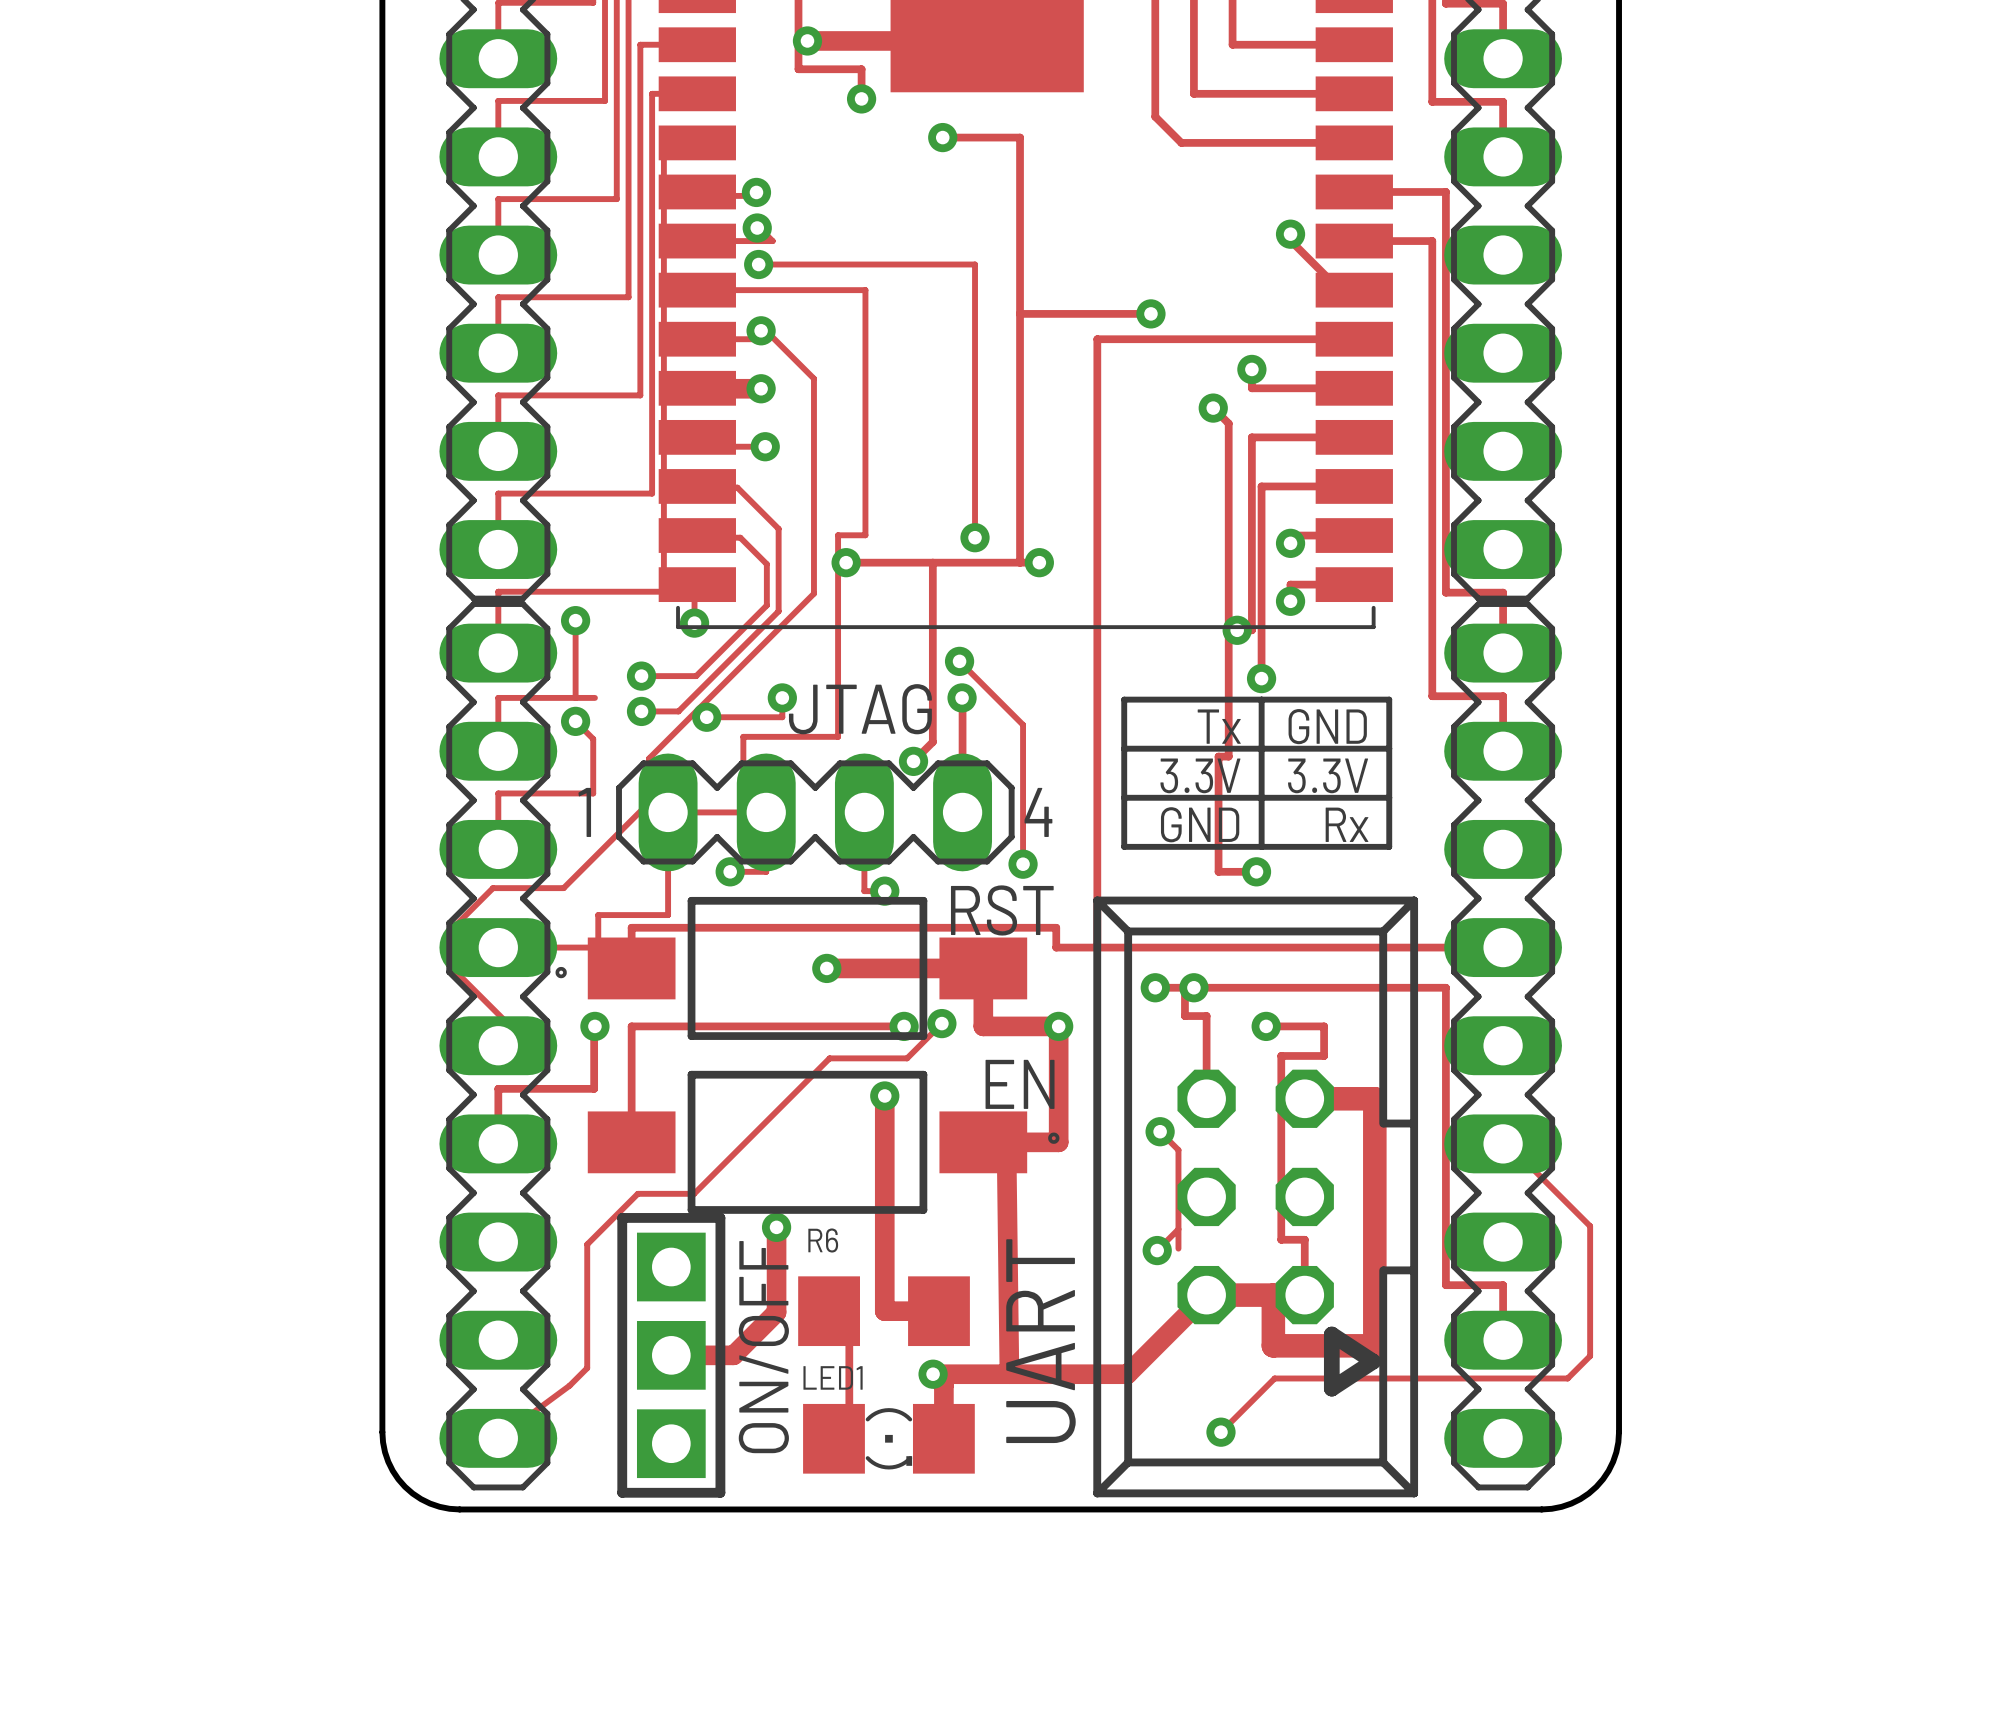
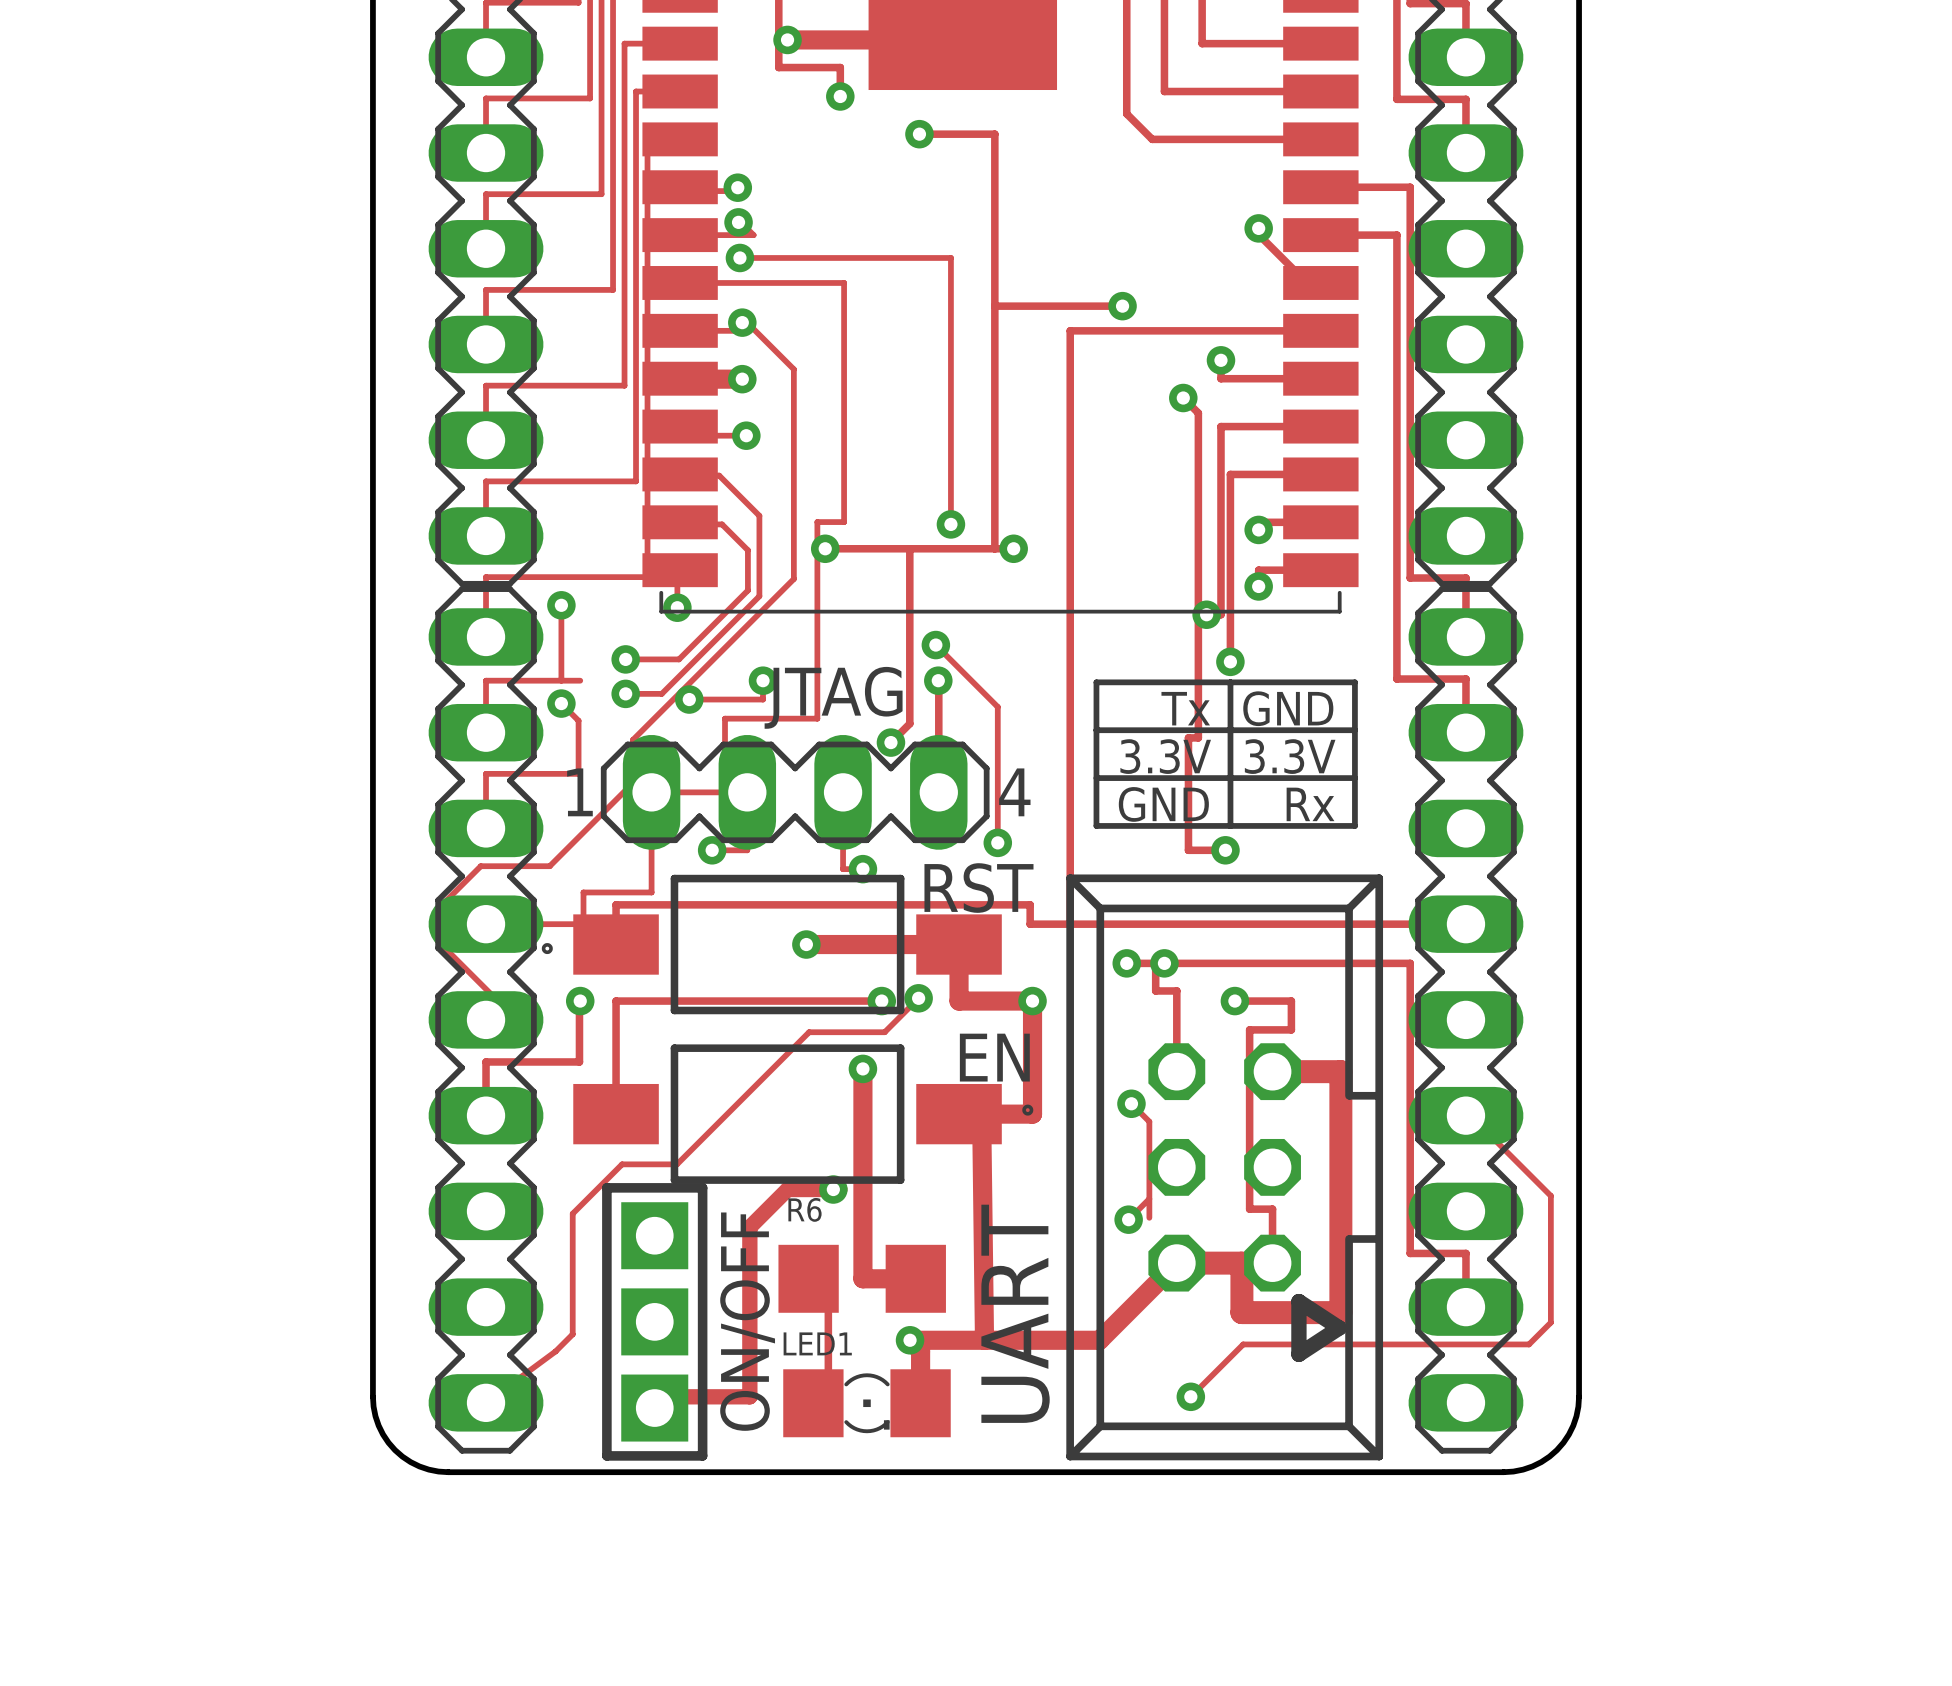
track: none -> (839, 1189) (787, 1189) (749, 1227) (749, 1396) (665, 1396) (654, 1408)
track: (776, 1227) (776, 1312) (733, 1355) (671, 1355) -> none
via position: (776, 1227) -> (833, 1189)

